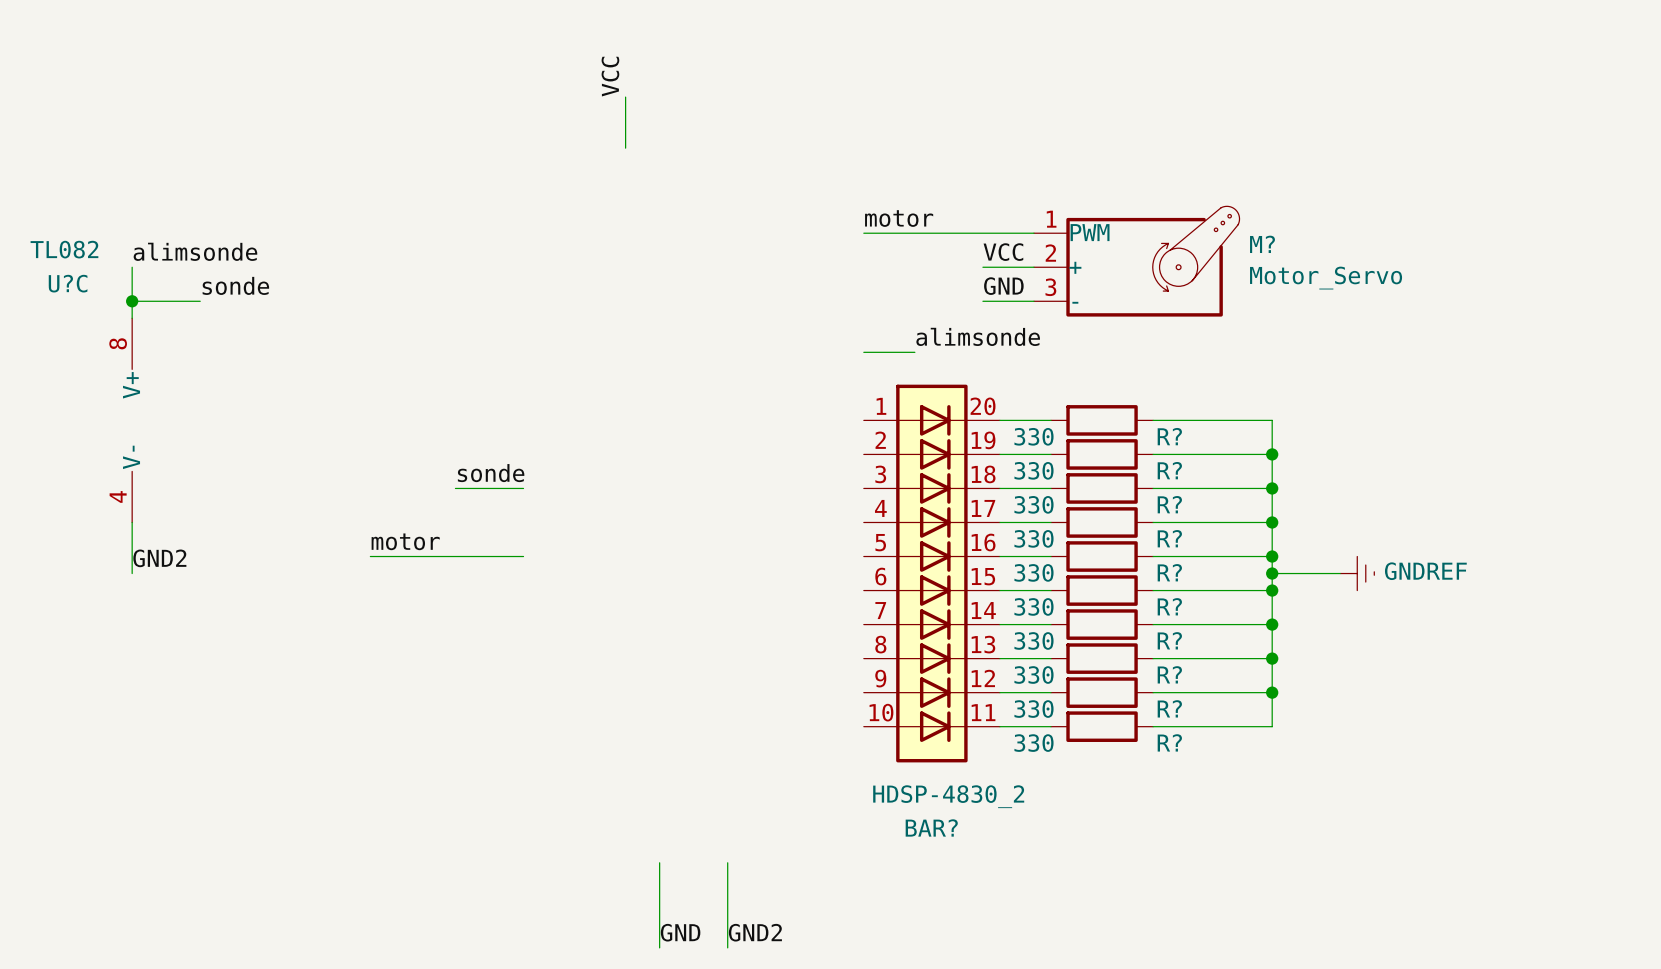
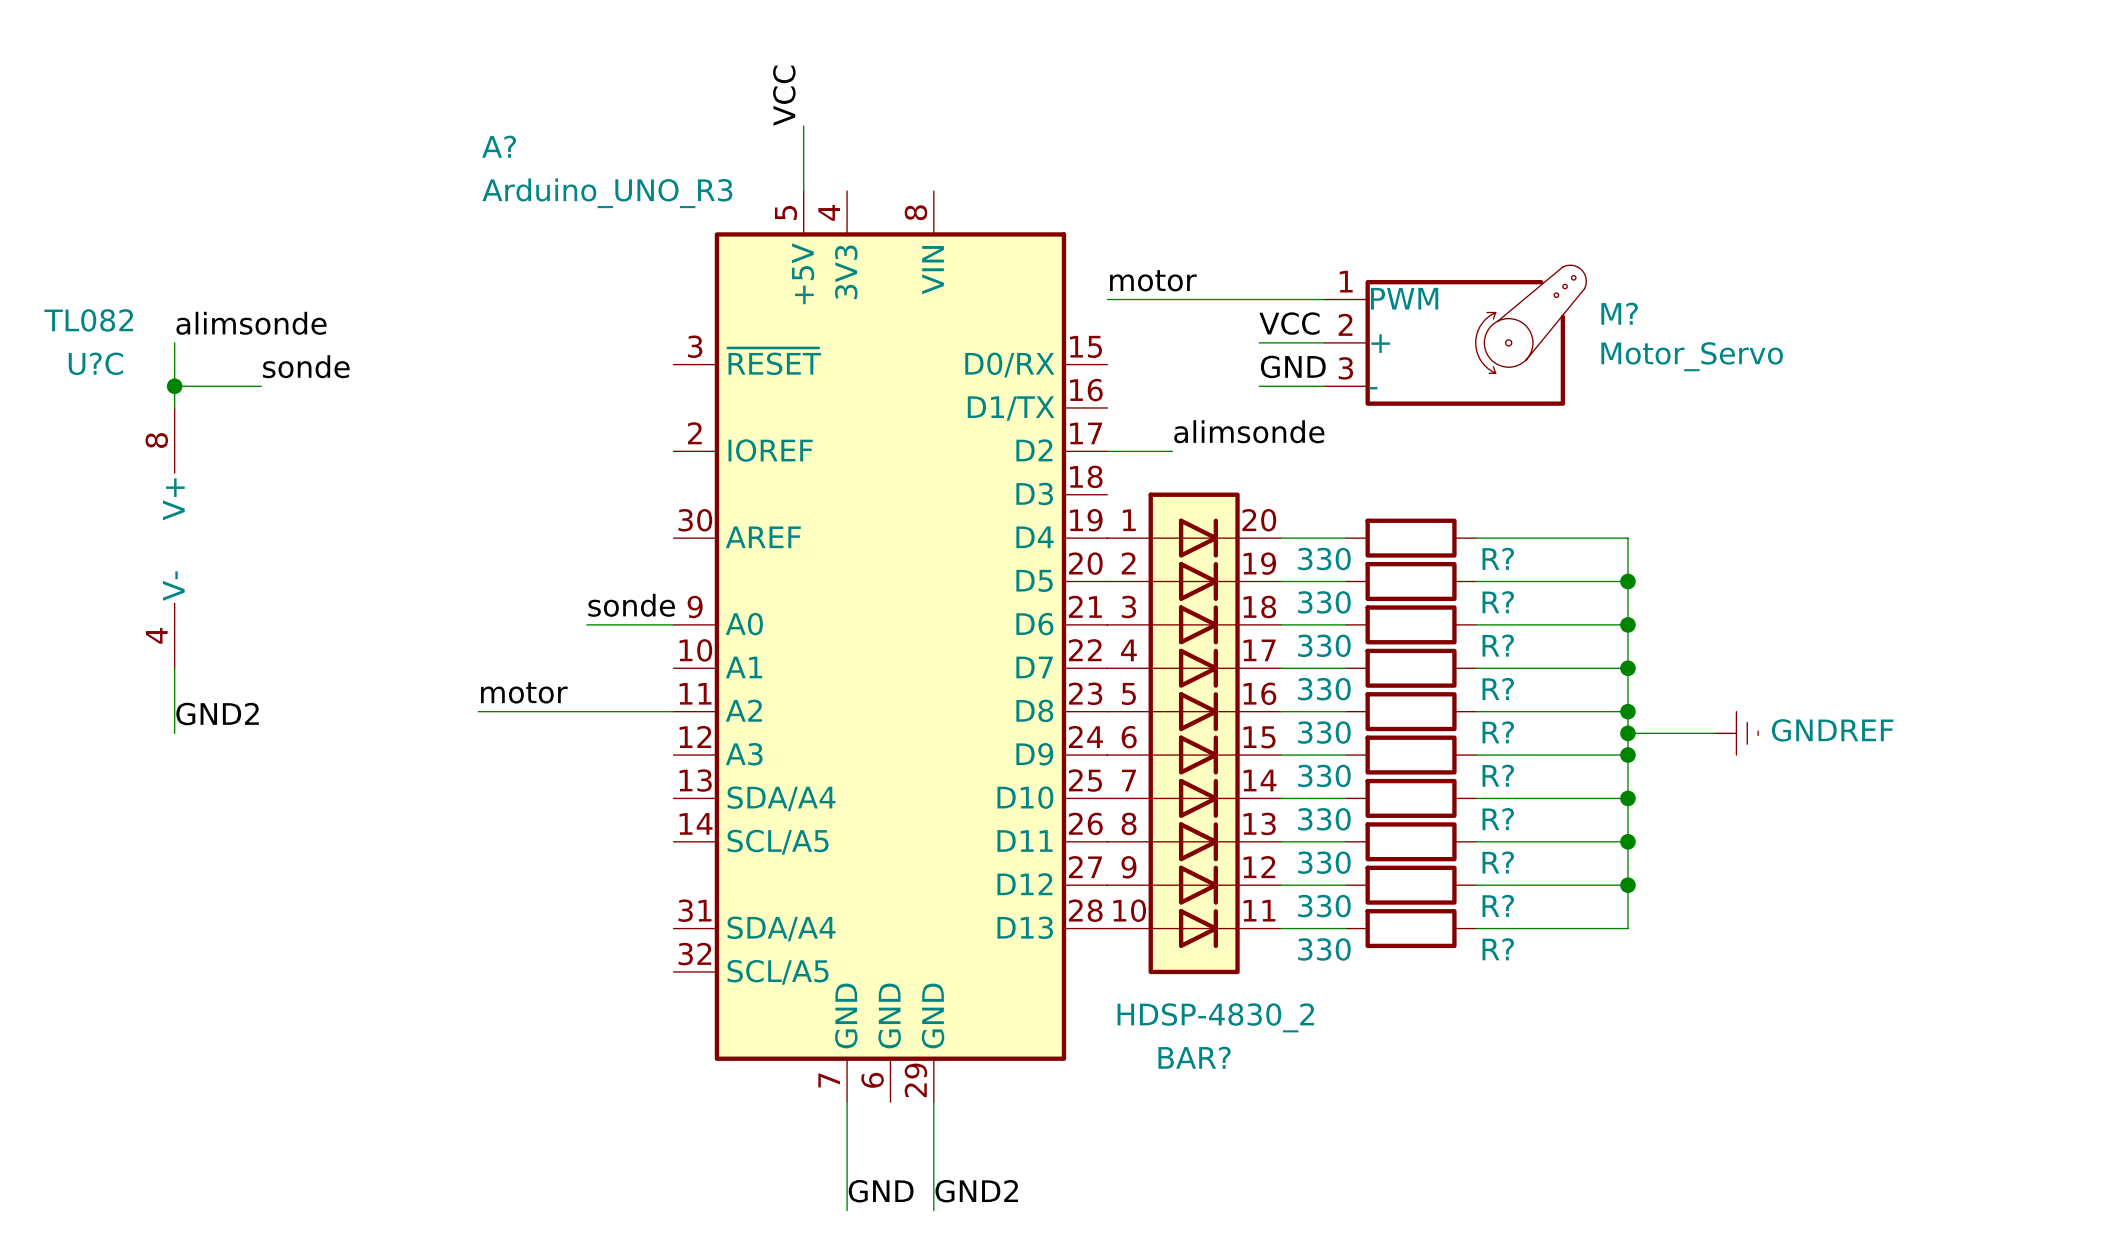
A?: none -> Arduino_UNO_R3 (890, 646)

